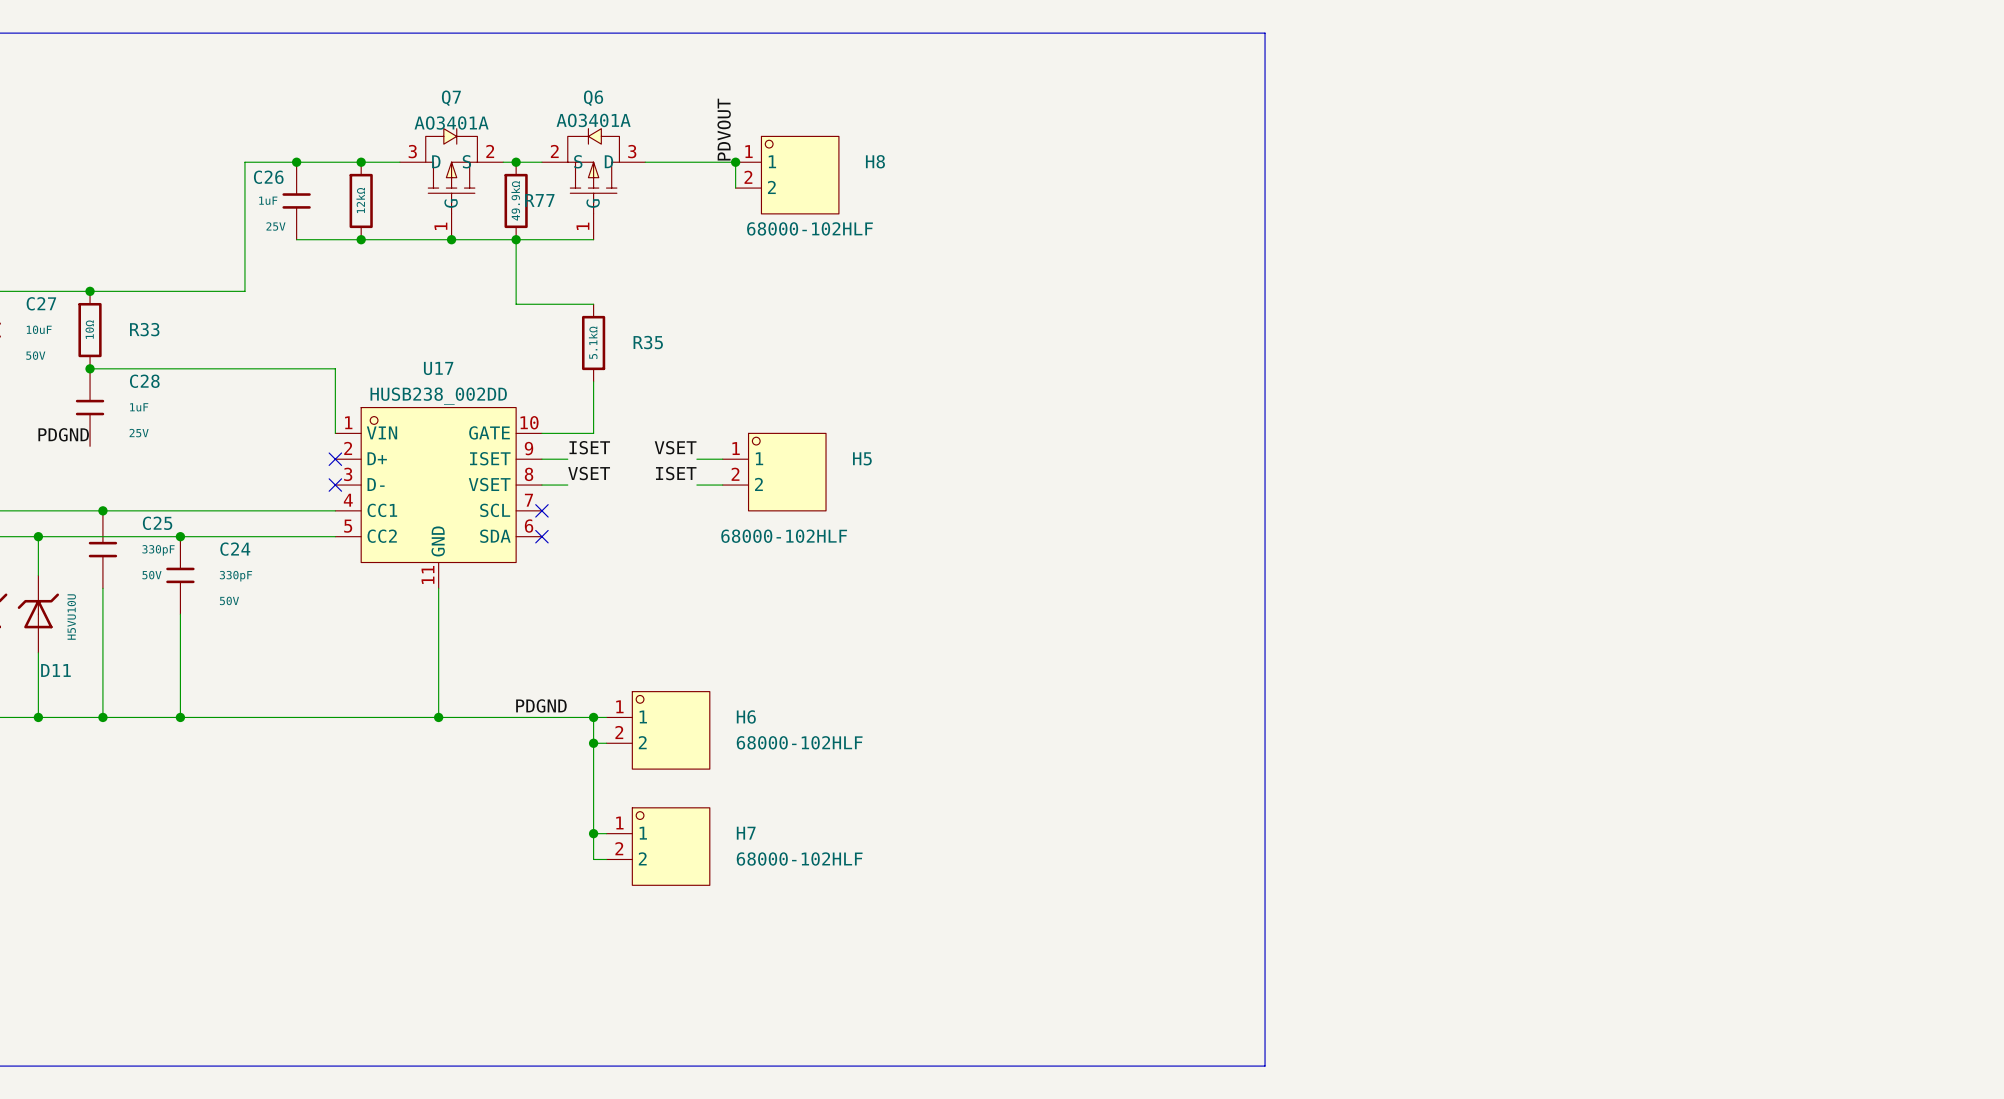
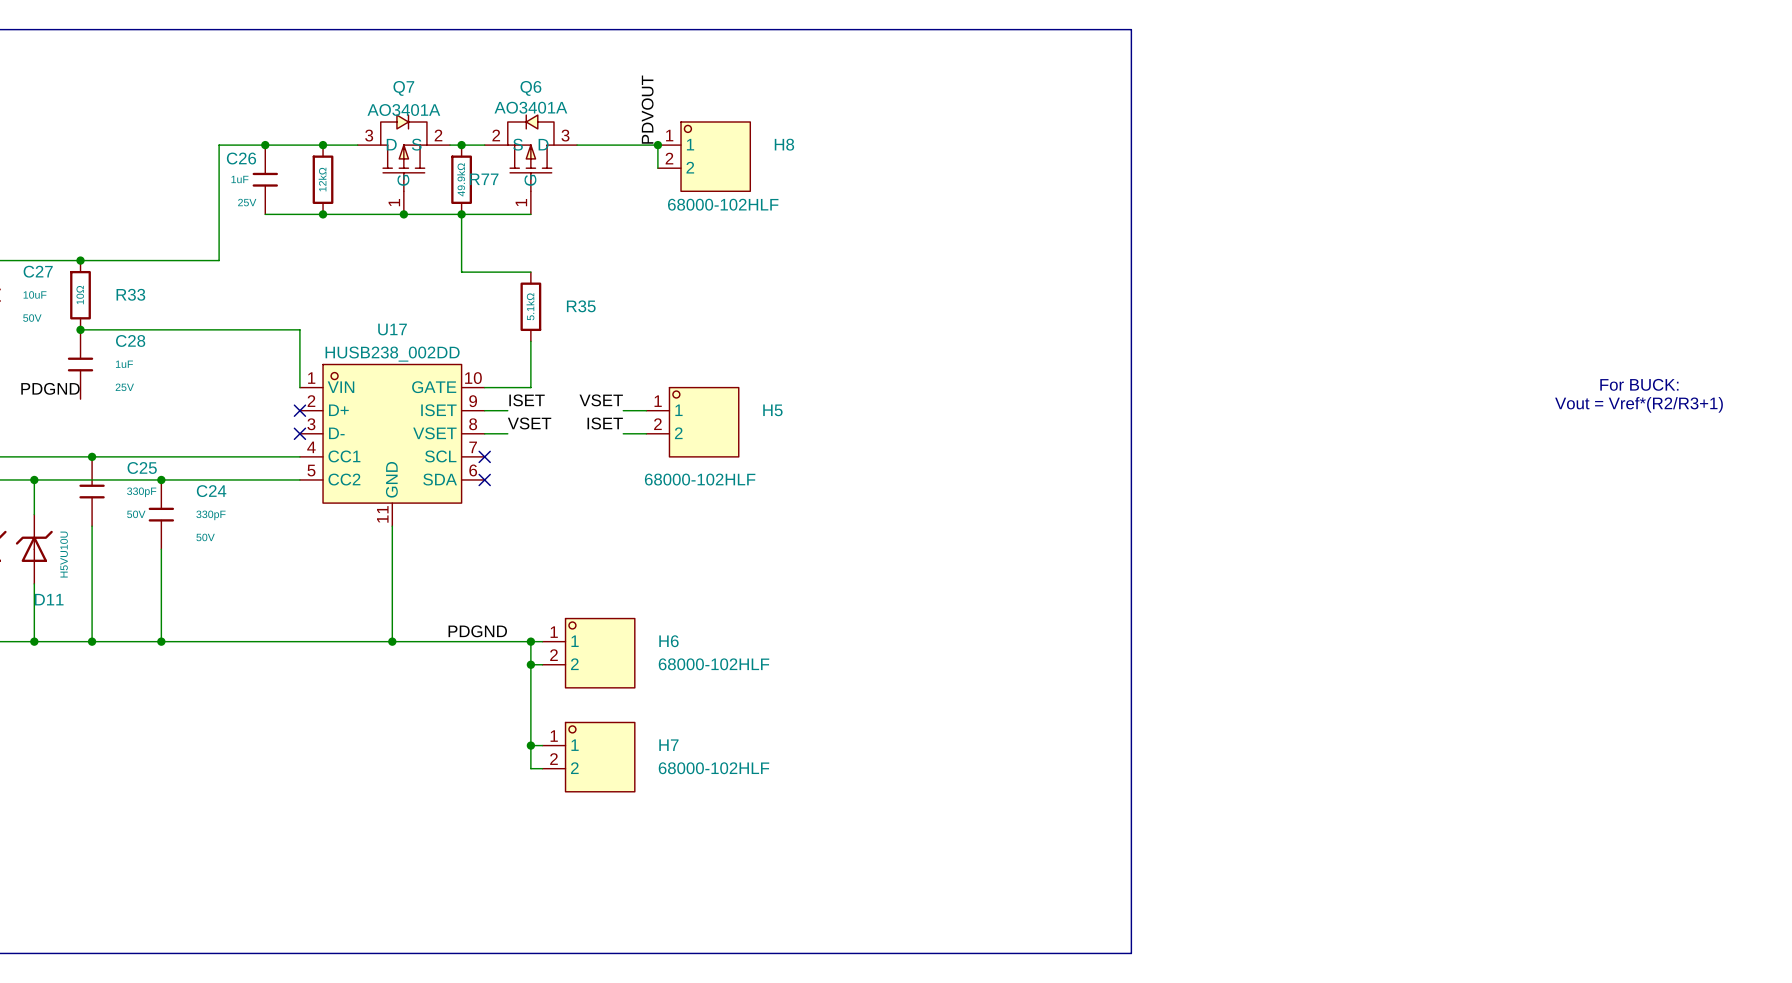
text: none -> For BUCK: (1639, 384)
text: none -> Vout = Vref*(R2/R3+1) (1639, 404)

